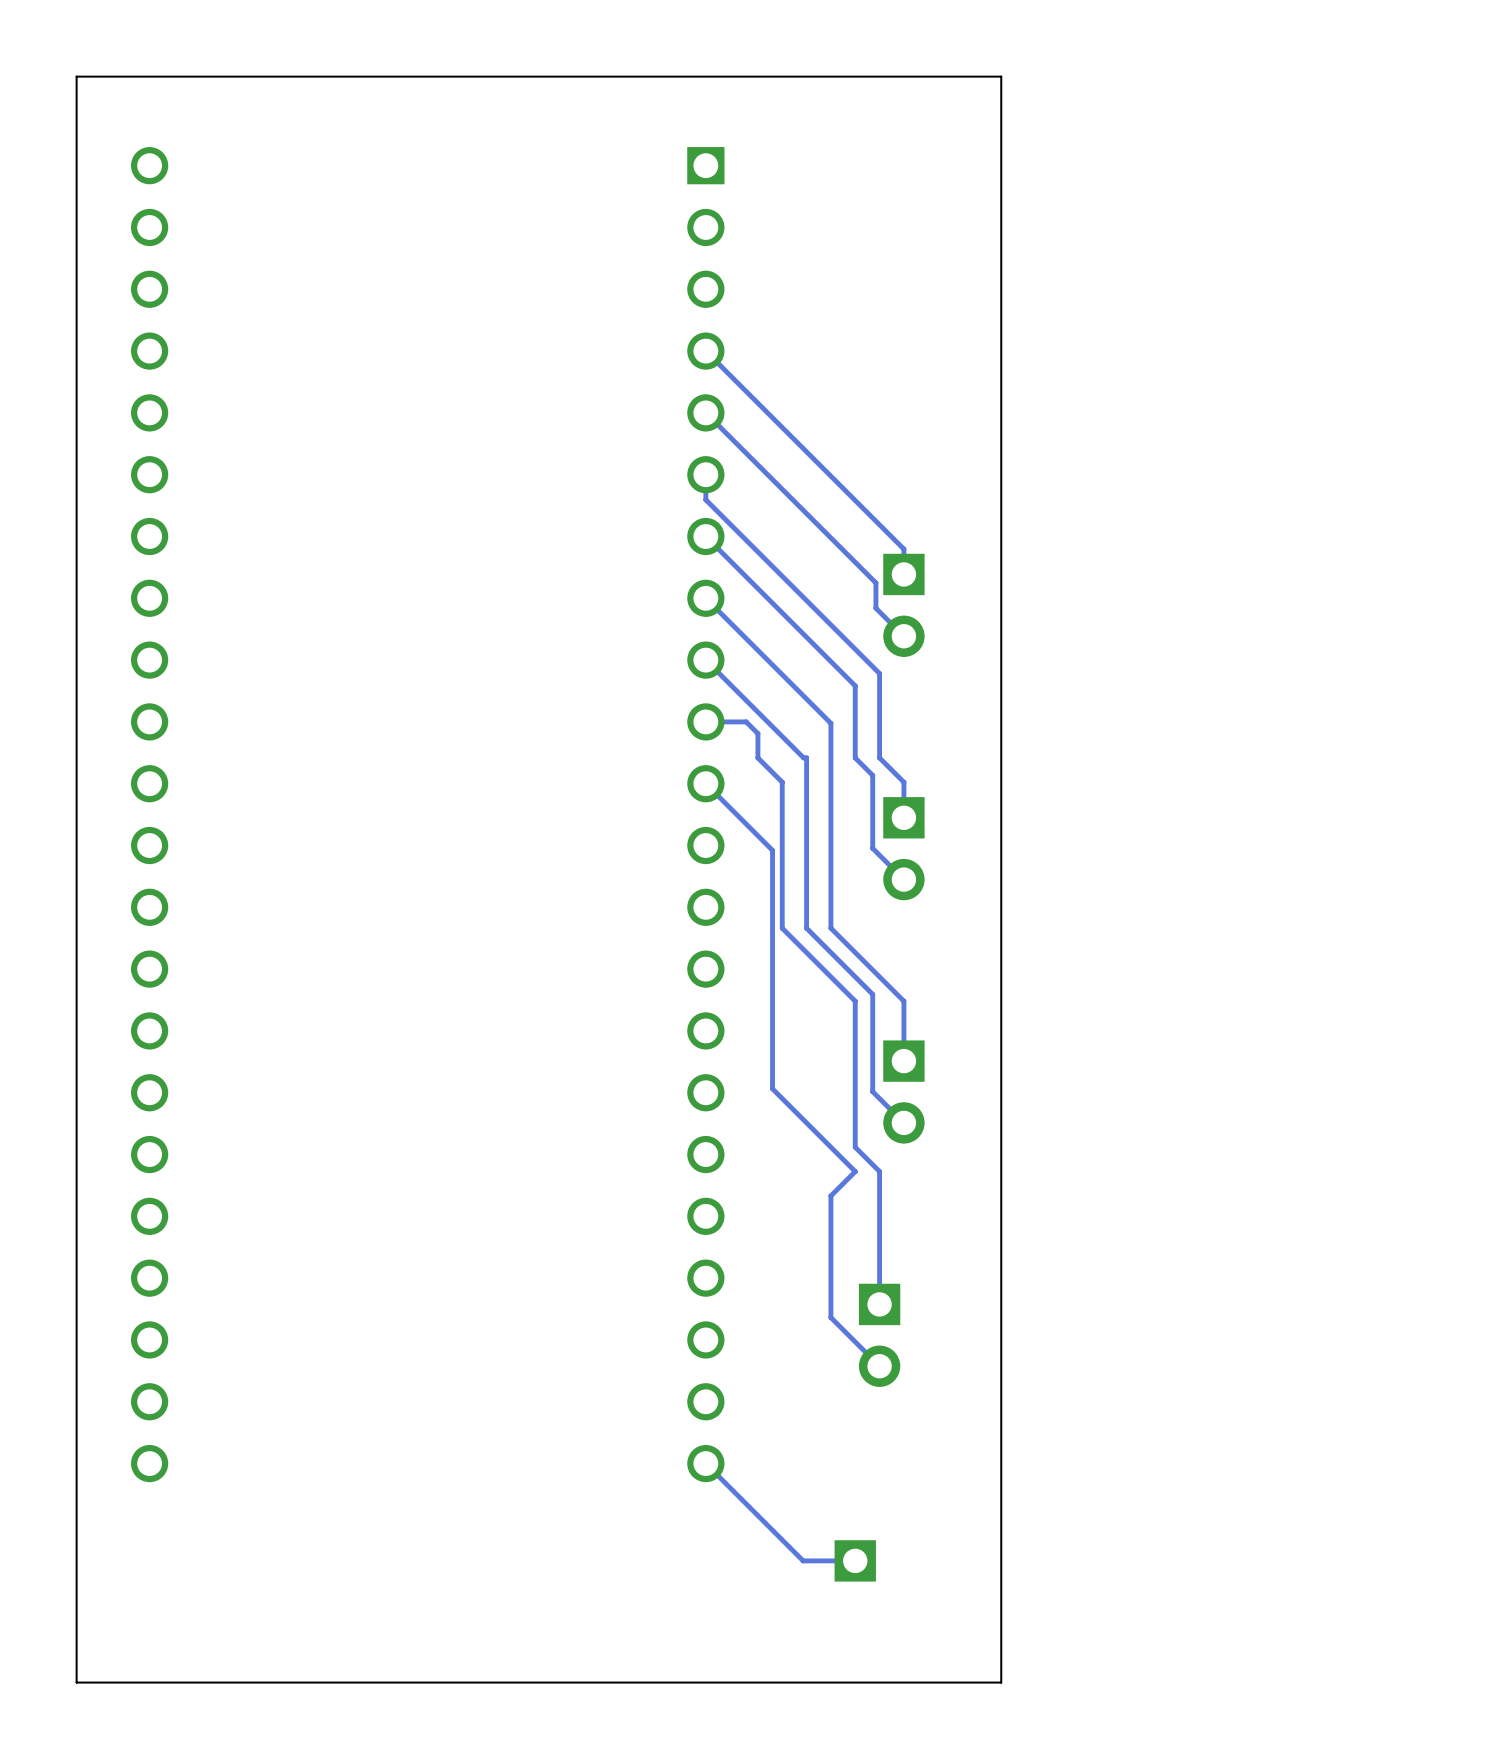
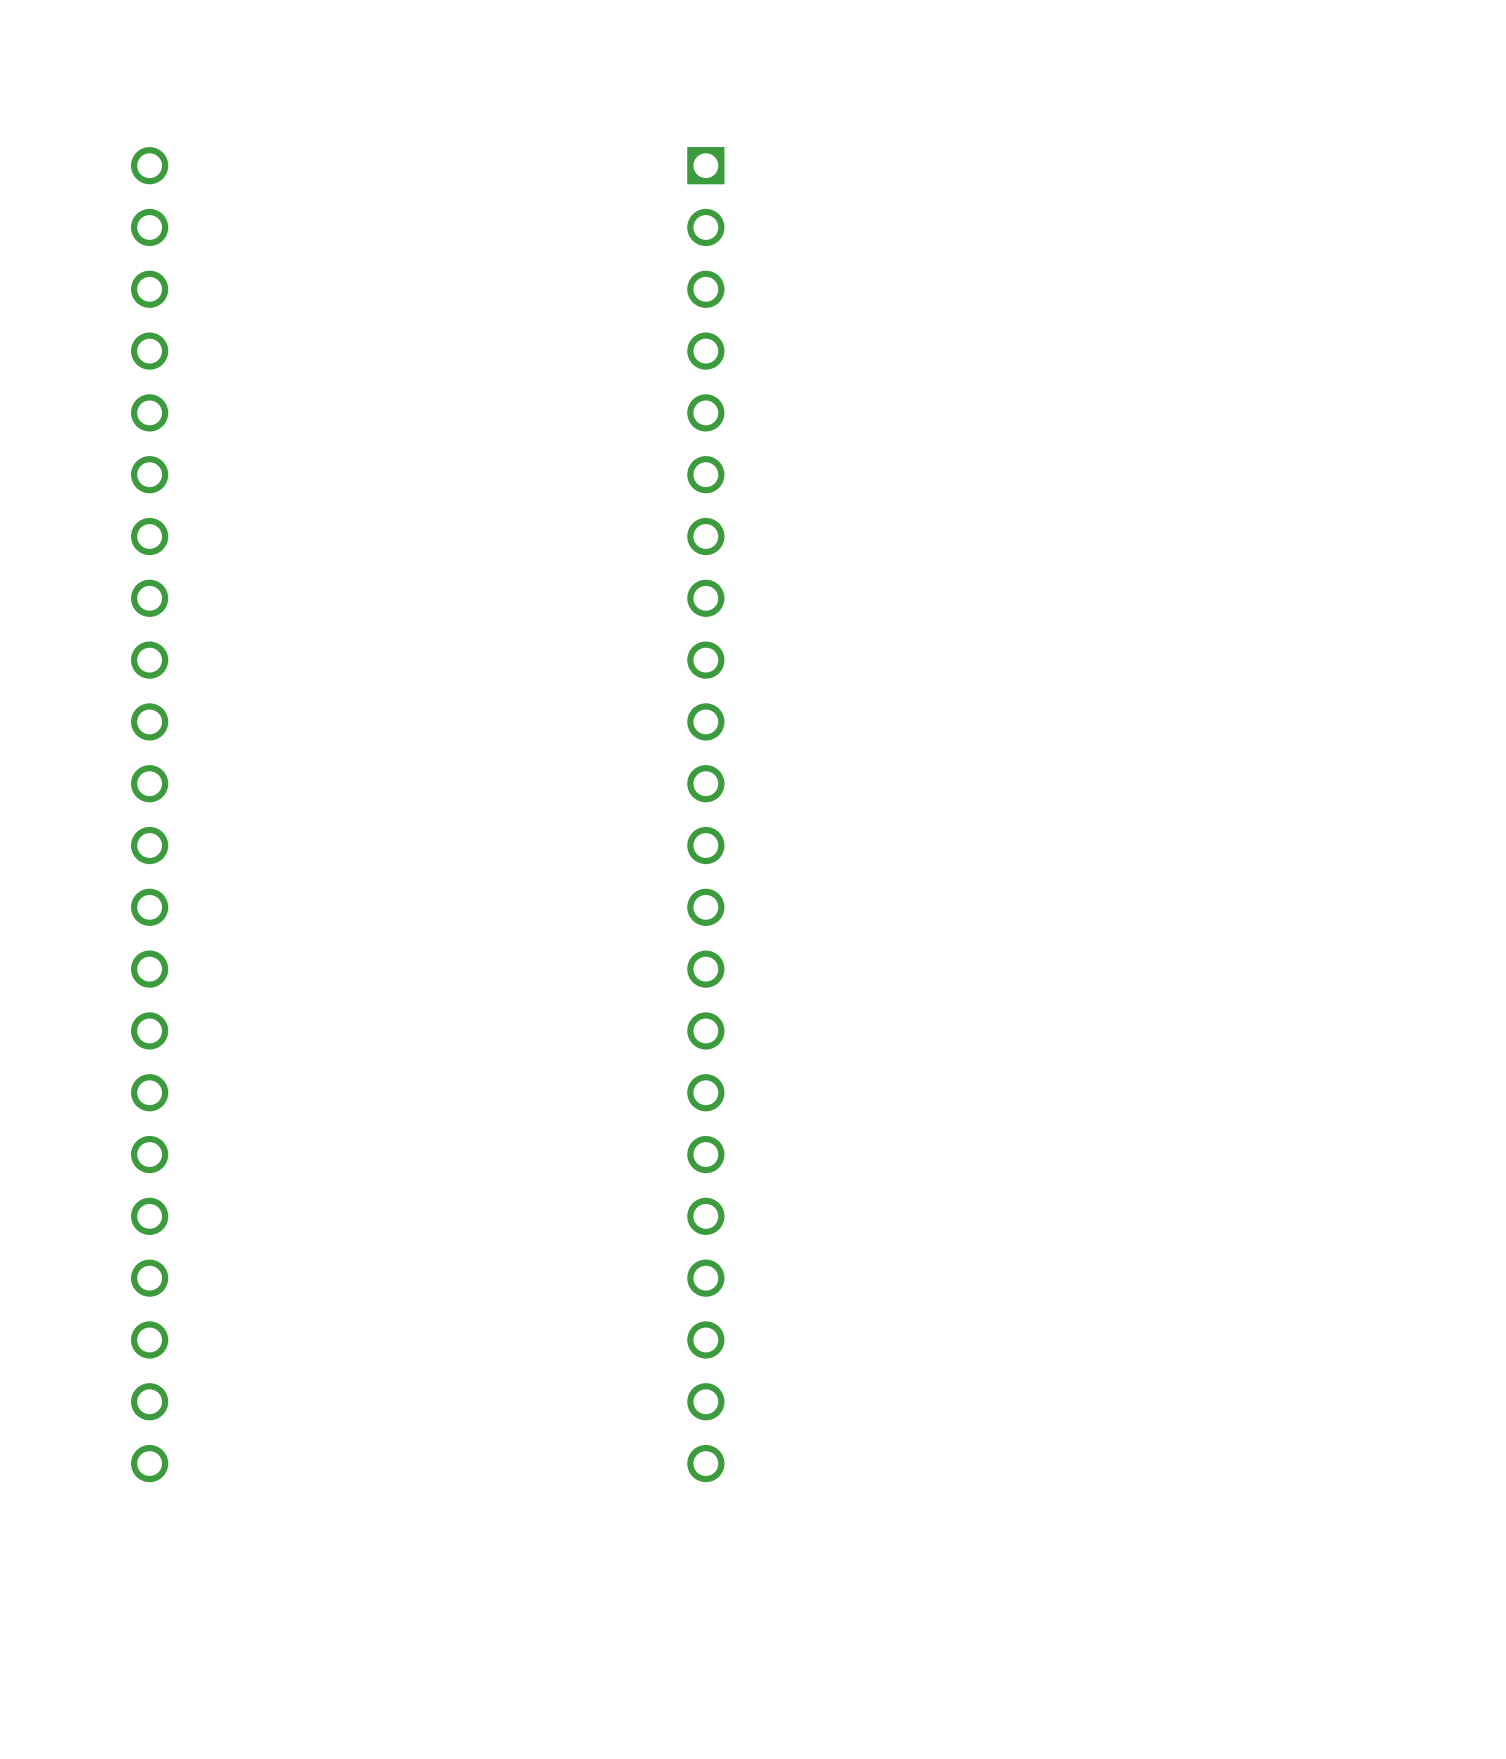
board edge: (1001, 76) (76, 76) (76, 1682) (1001, 1682) (1001, 76) -> none
track: (705, 351) (903, 549) (903, 574) -> none
track: (705, 412) (875, 582) (875, 608) (903, 636) -> none
track: (705, 474) (705, 499) (879, 673) (879, 757) (903, 782) (903, 817) -> none
track: (705, 536) (855, 685) (855, 757) (872, 775) (872, 848) (903, 879) -> none
track: (705, 598) (830, 723) (830, 928) (903, 1001) (903, 1061) -> none
part: (903, 605) -> none
track: (705, 660) (803, 757) (806, 757) (806, 928) (872, 994) (872, 1091) (903, 1122) -> none
track: (705, 721) (746, 721) (757, 733) (757, 757) (782, 782) (782, 928) (855, 1001) (855, 1147) (879, 1171) (879, 1304) -> none
track: (705, 783) (772, 850) (772, 1088) (855, 1171) (830, 1195) (830, 1317) (879, 1366) -> none
part: (903, 848) -> none
part: (903, 1092) -> none
part: (879, 1335) -> none
track: (705, 1463) (803, 1560) (855, 1560) -> none
part: (855, 1560) -> none

